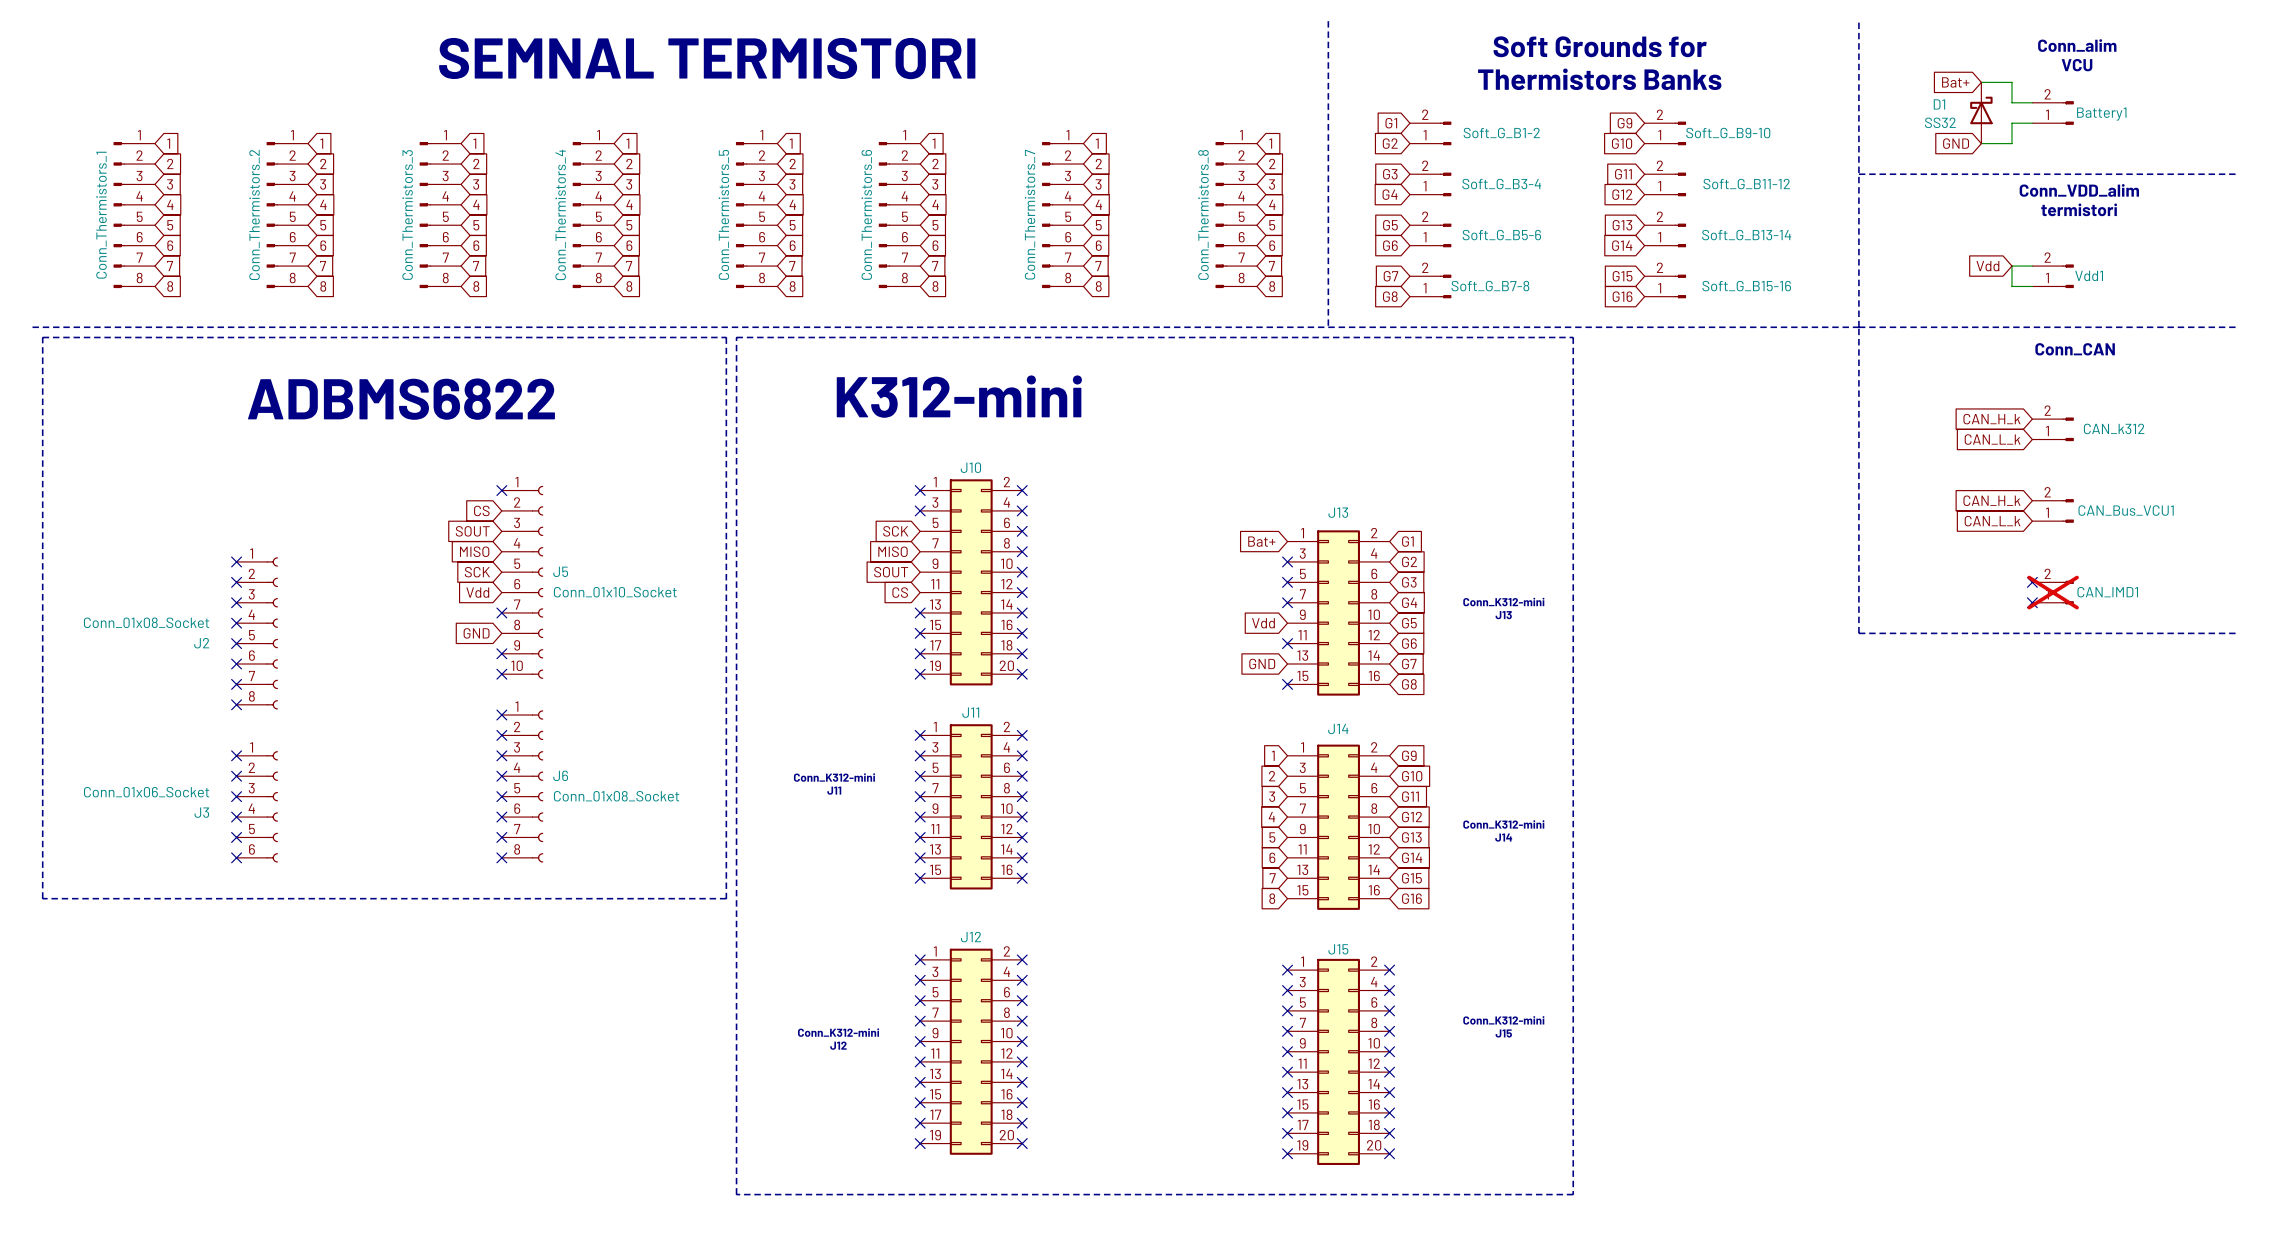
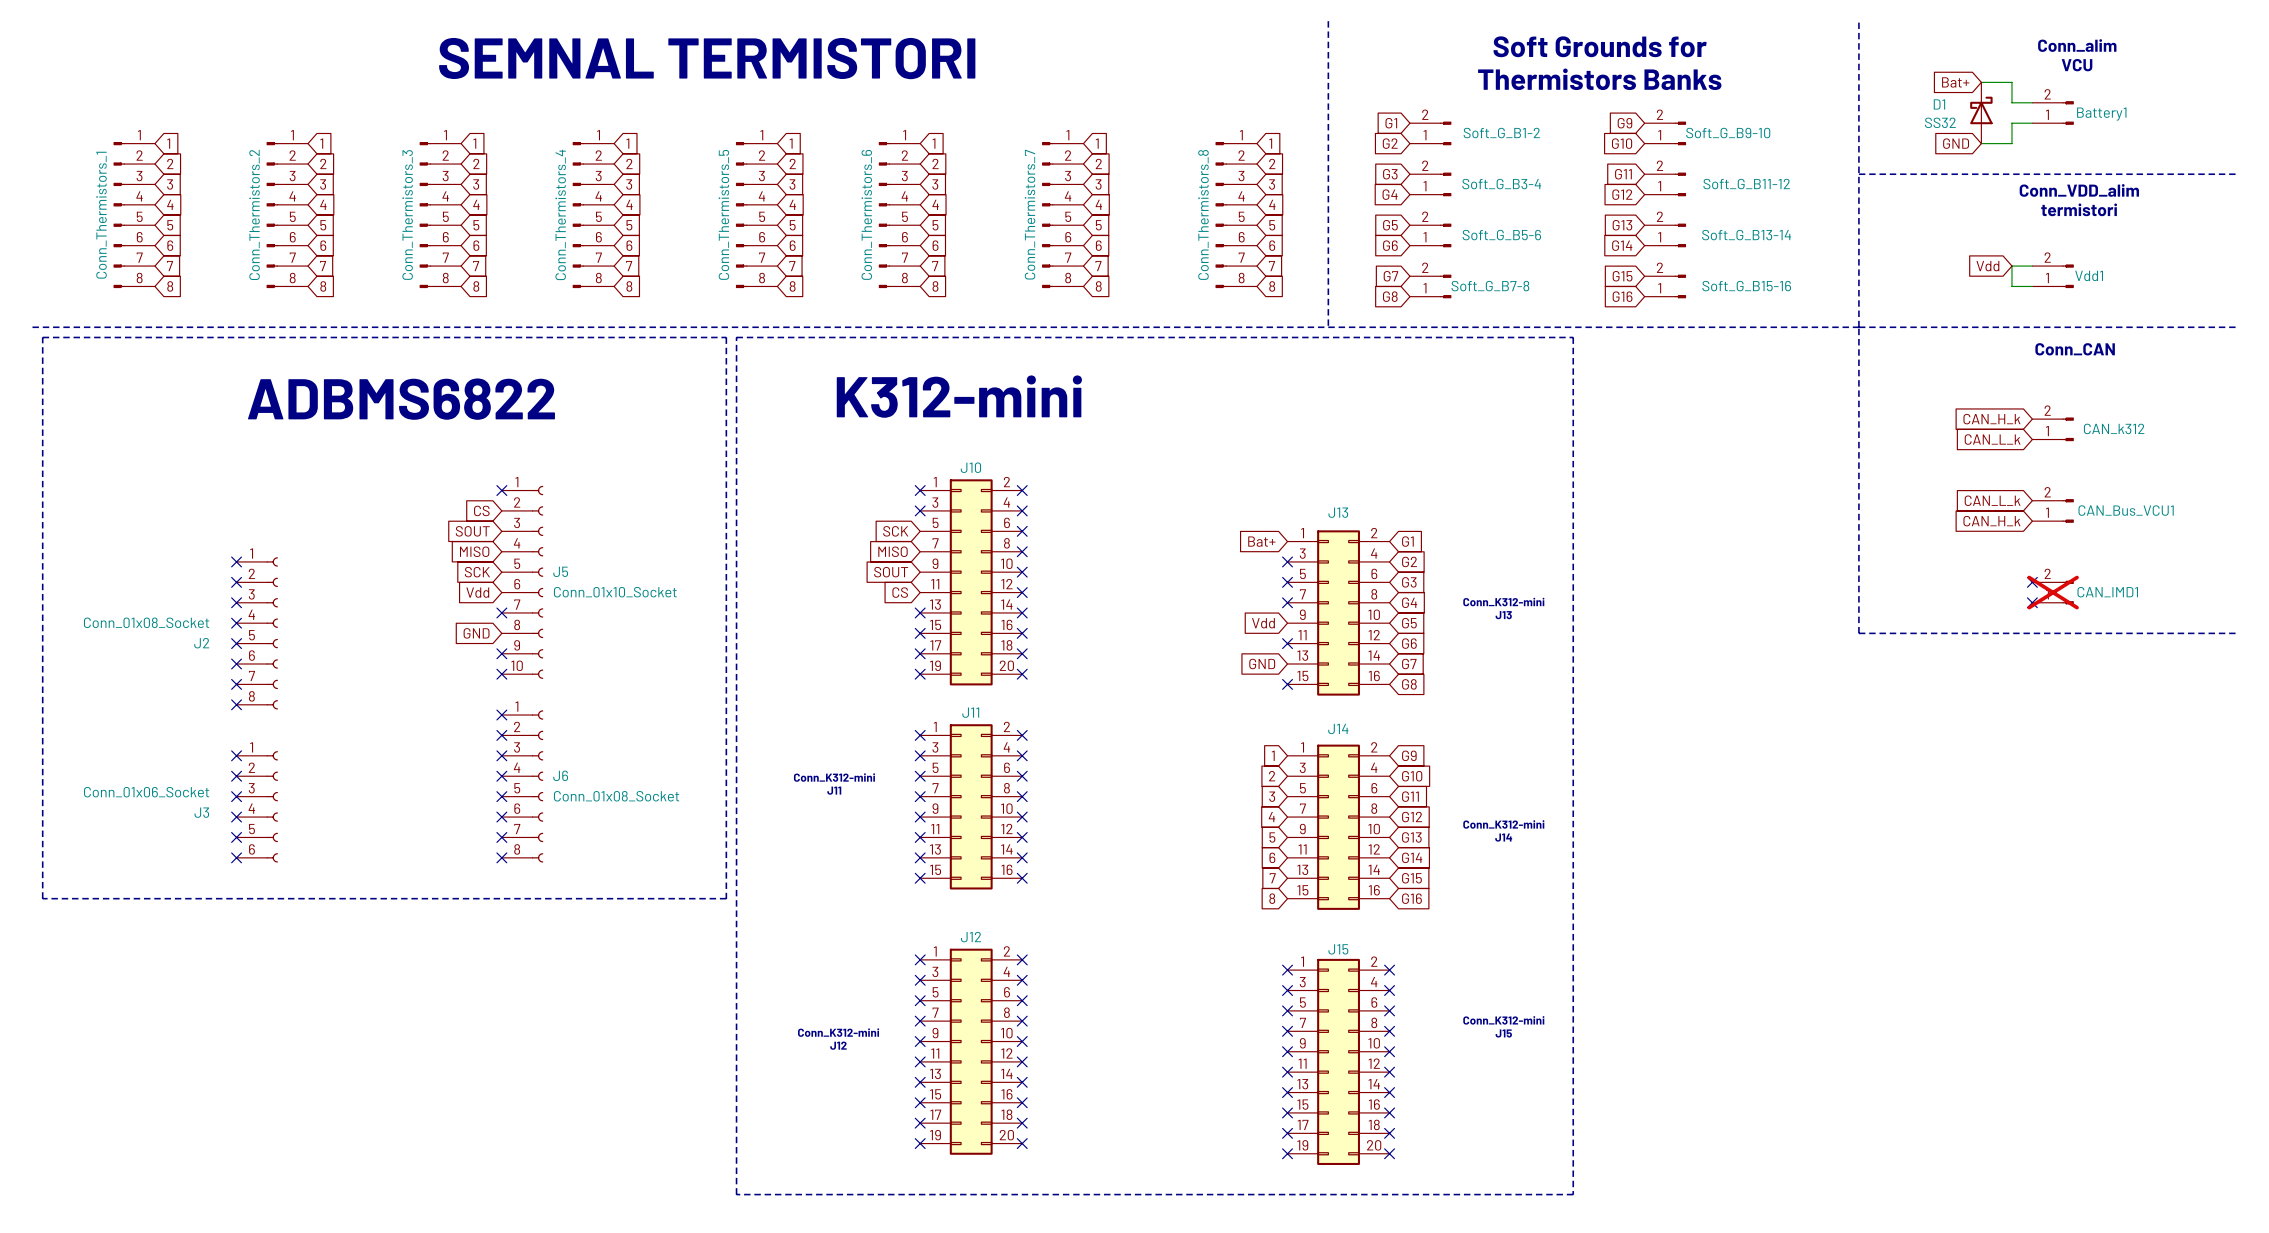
global label: CAN_H_k (1991, 500) -> CAN_L_k (1992, 500)
global label: CAN_L_k (1992, 521) -> CAN_H_k (1991, 521)

